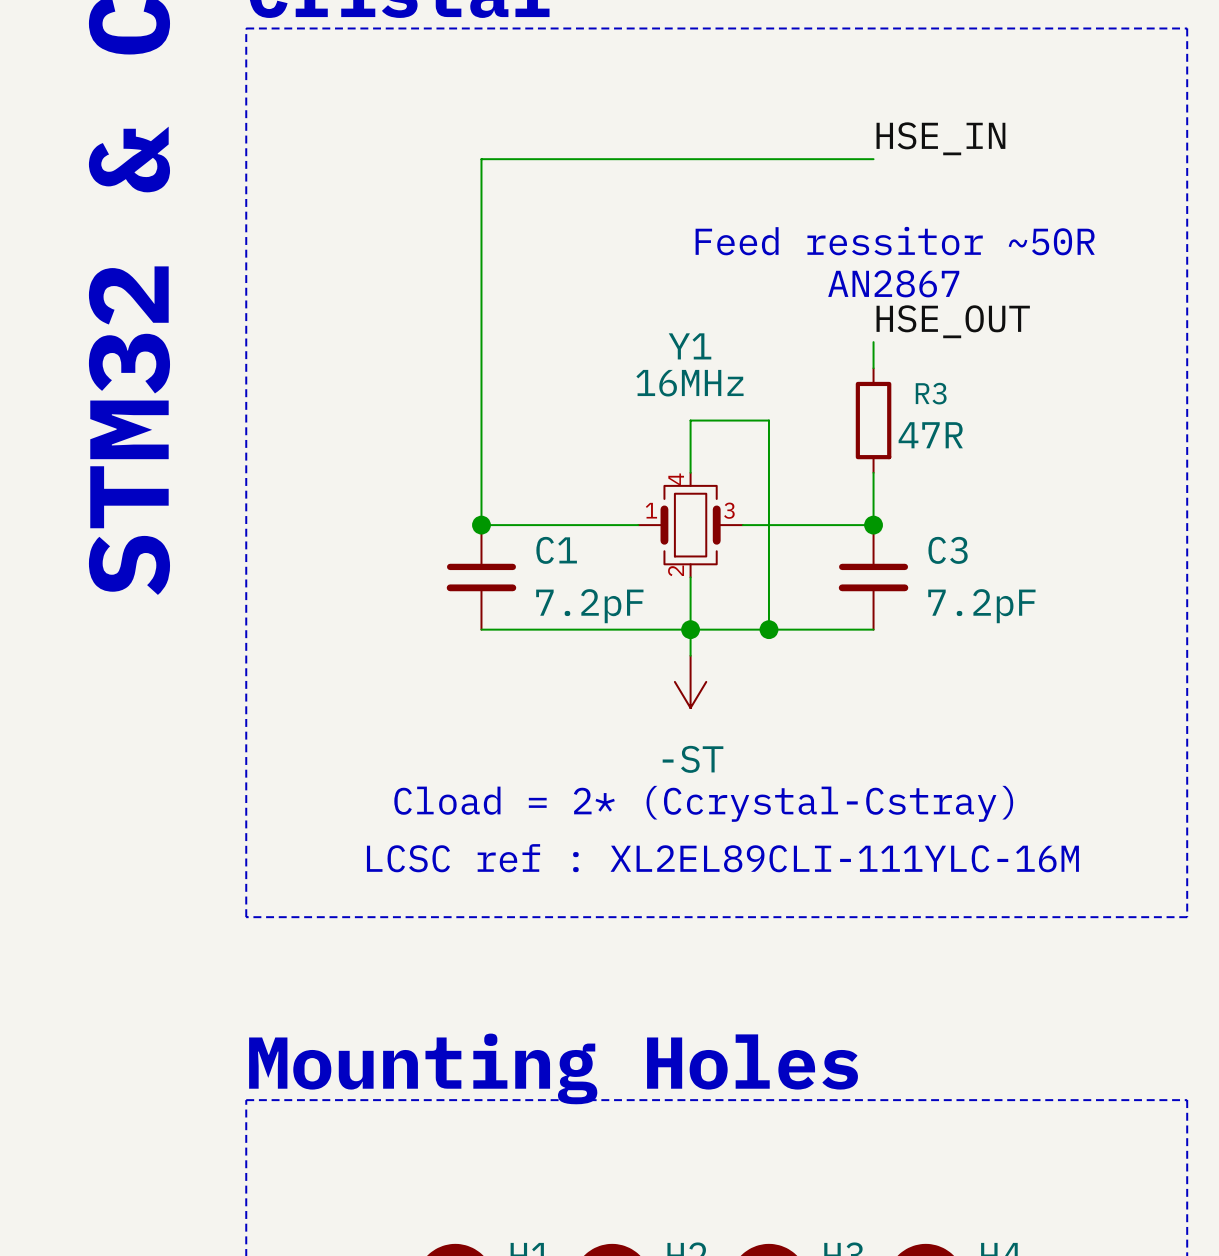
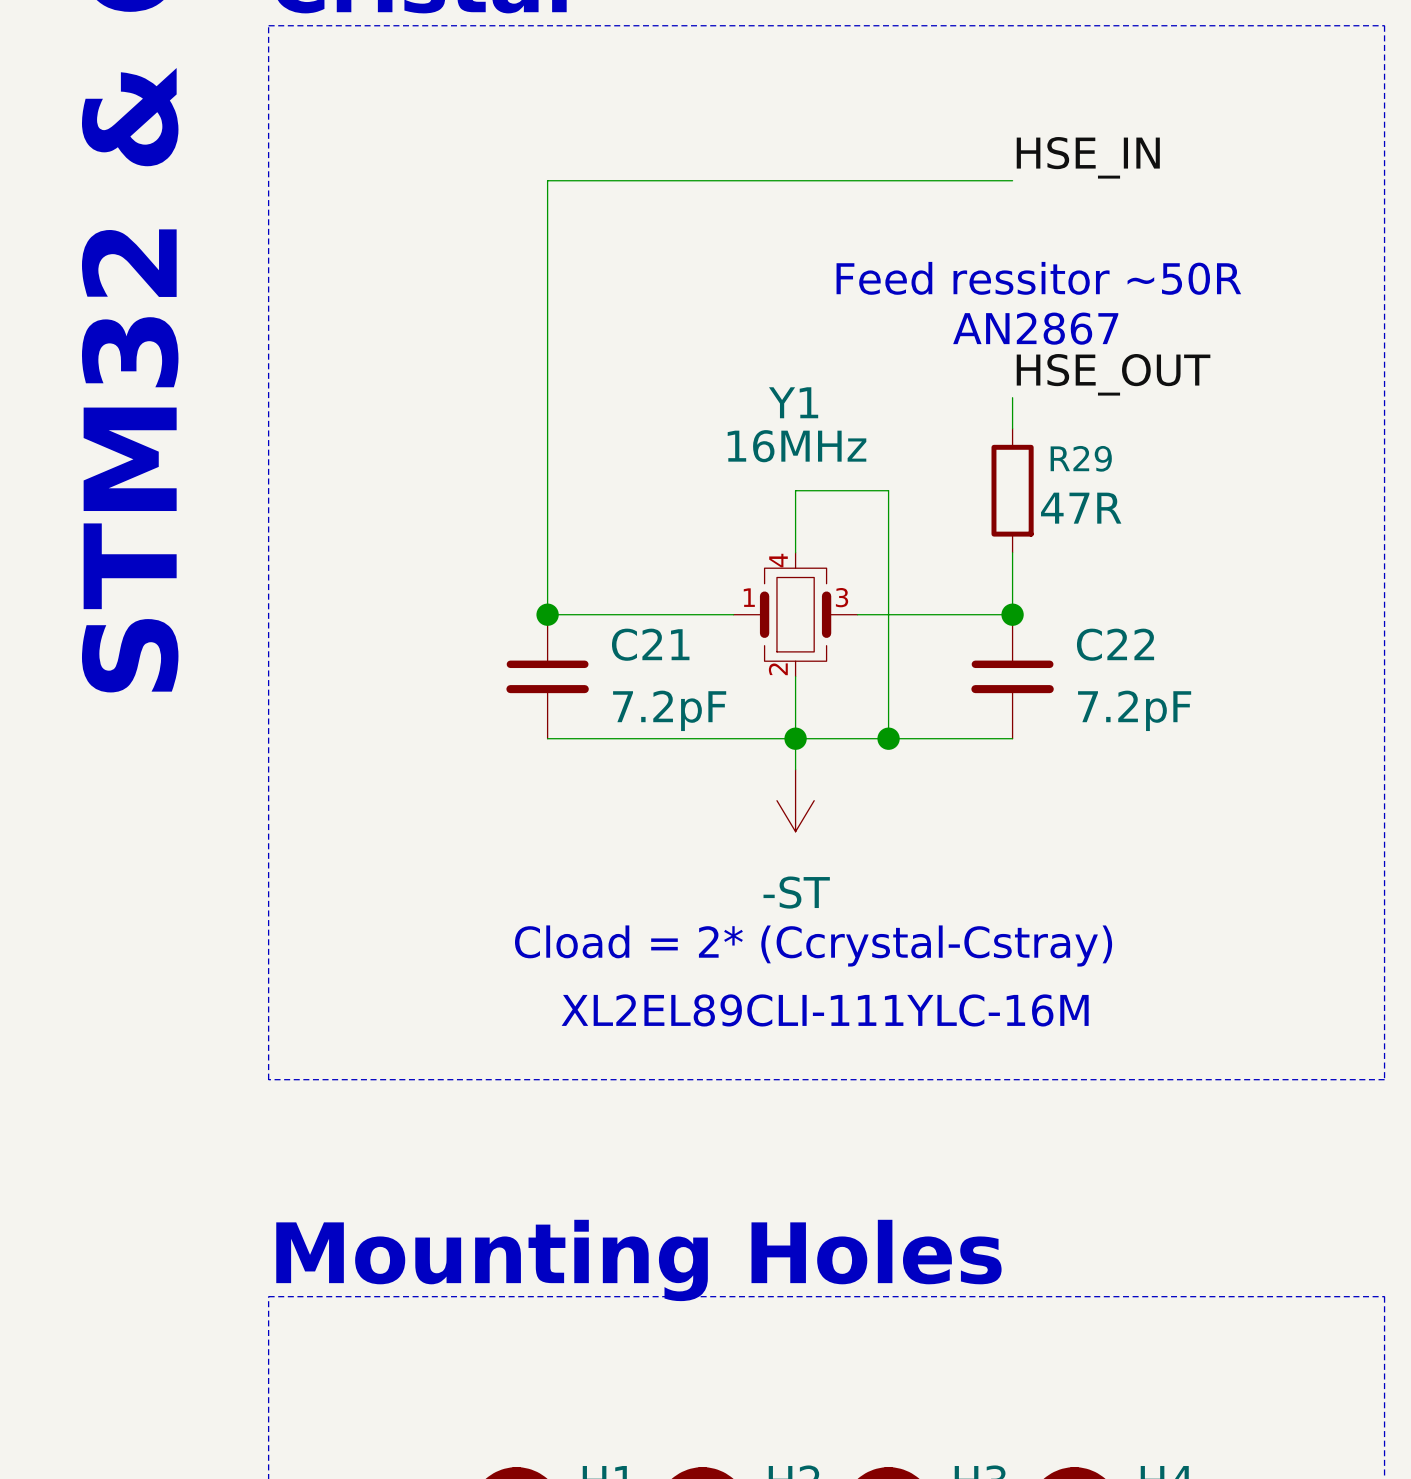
R3 name: R3 (931, 393) -> R29 (1081, 458)
C1 name: C1 (556, 550) -> C21 (650, 644)
C3 name: C3 (948, 550) -> C22 (1115, 644)
text: LCSC ref : XL2EL89CLI-111YLC-16M (722, 858) -> XL2EL89CLI-111YLC-16M (825, 1010)

